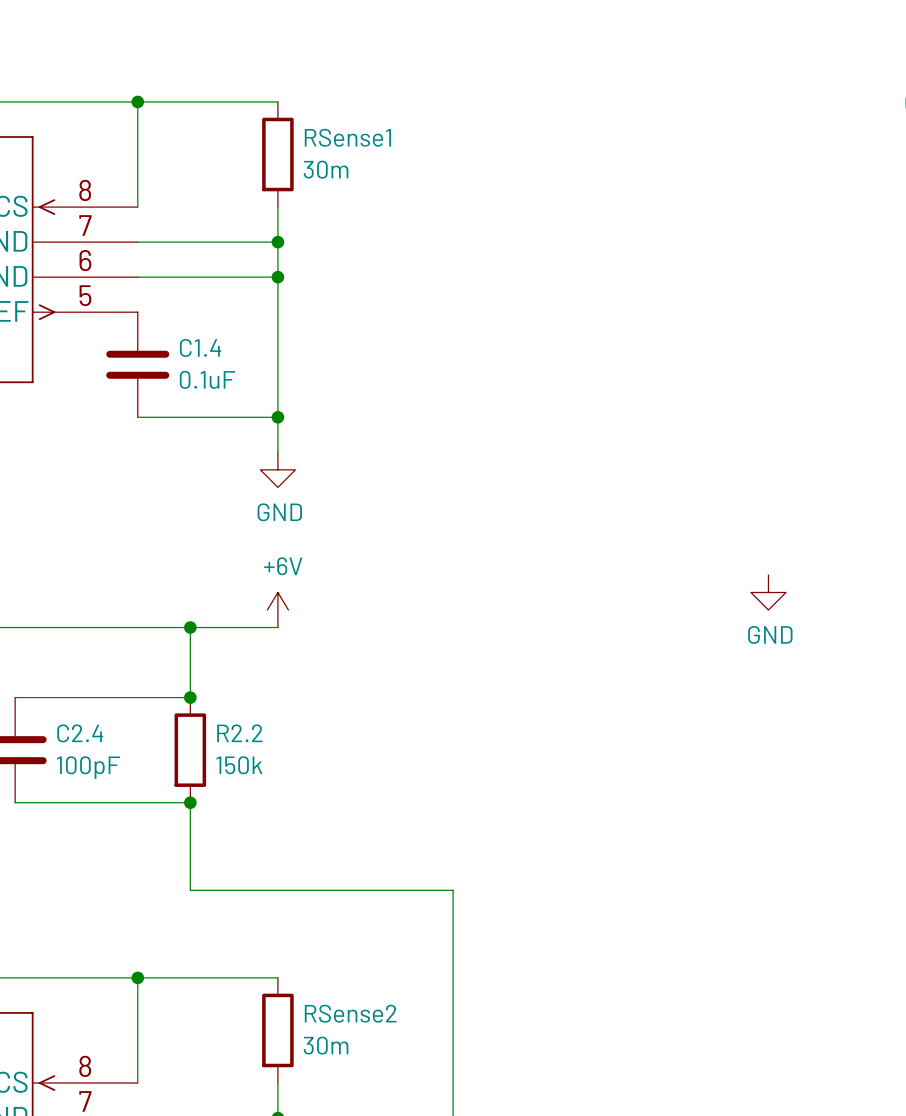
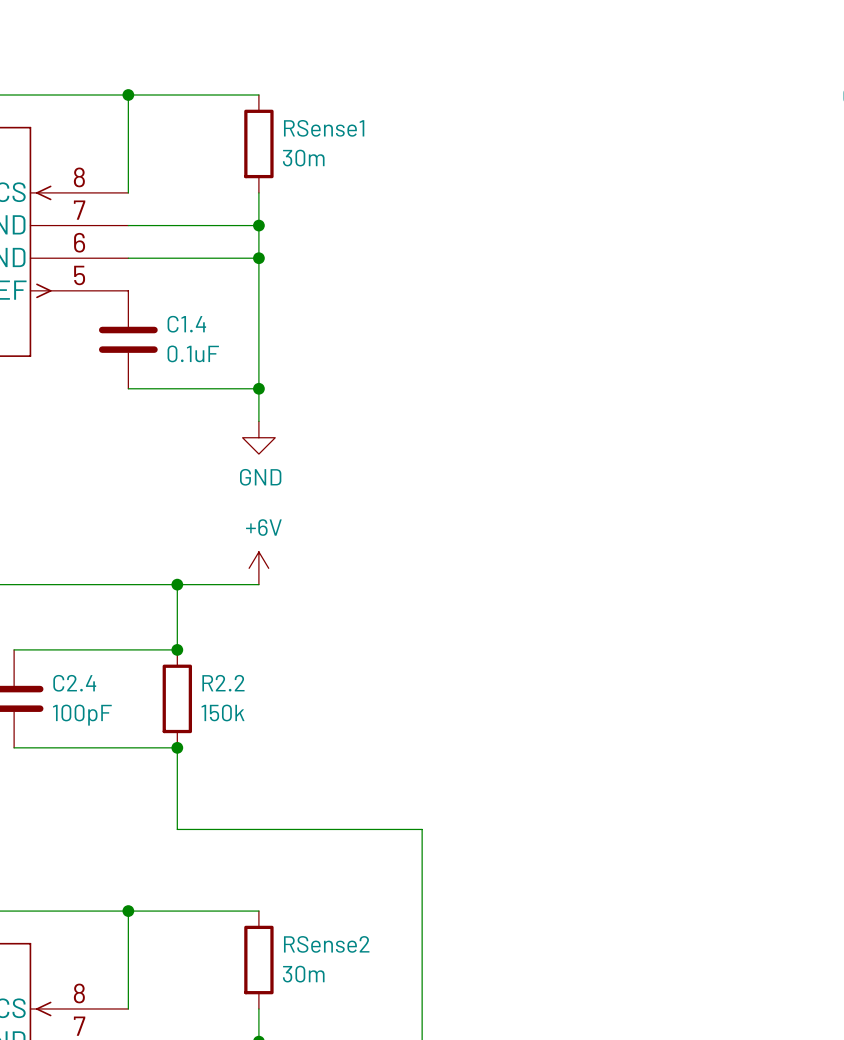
power symbol: GND (768, 592) -> none

